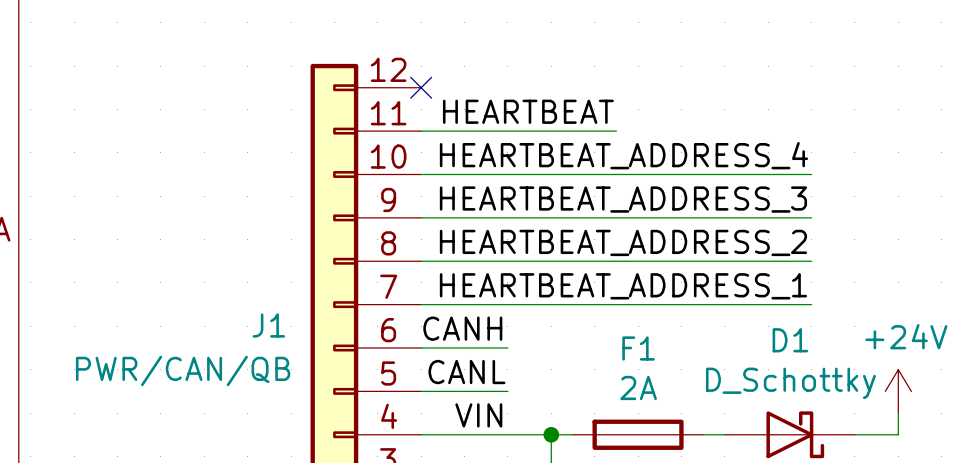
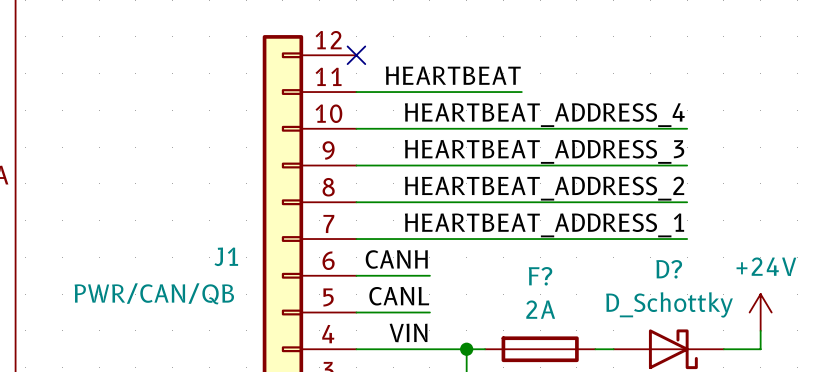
D1 name: D1 (790, 340) -> D? (669, 269)
F1 name: F1 (638, 348) -> F? (540, 276)

